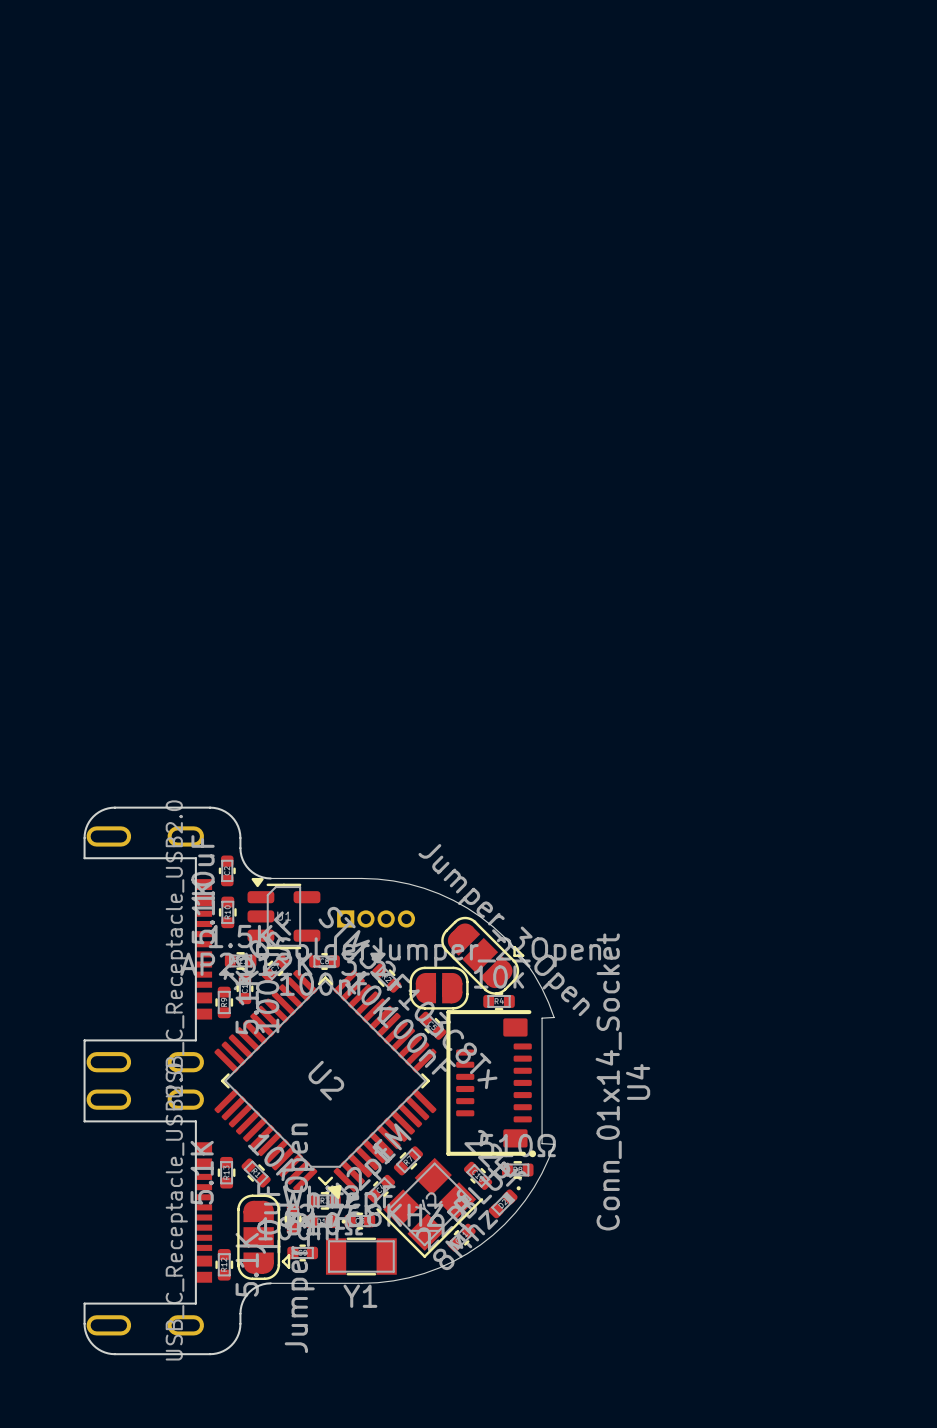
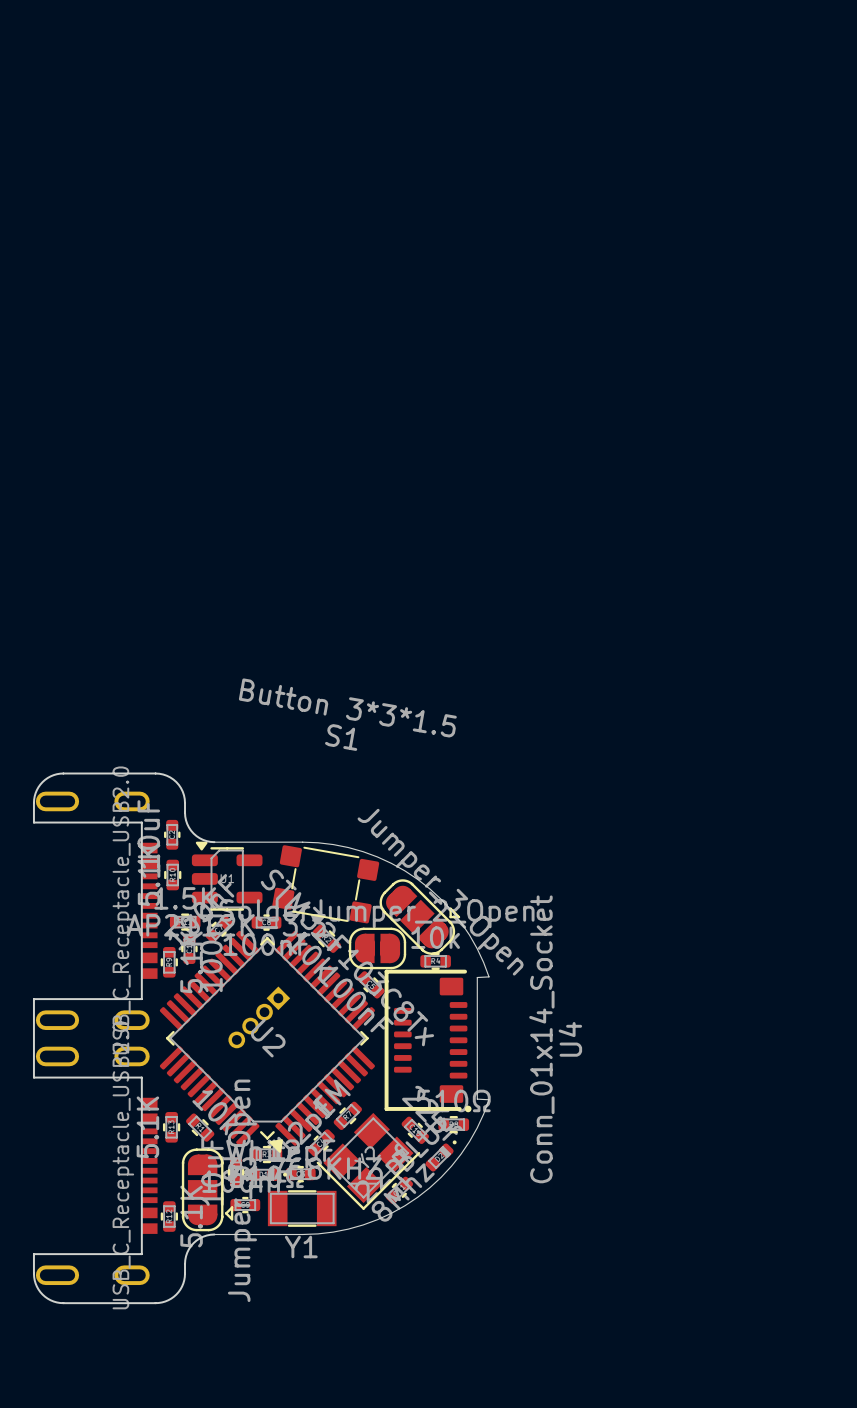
part: (376, 918) -> none
S1: none -> Button 3*3*1.5 (325, 884)
part: none -> (259, 1017)

